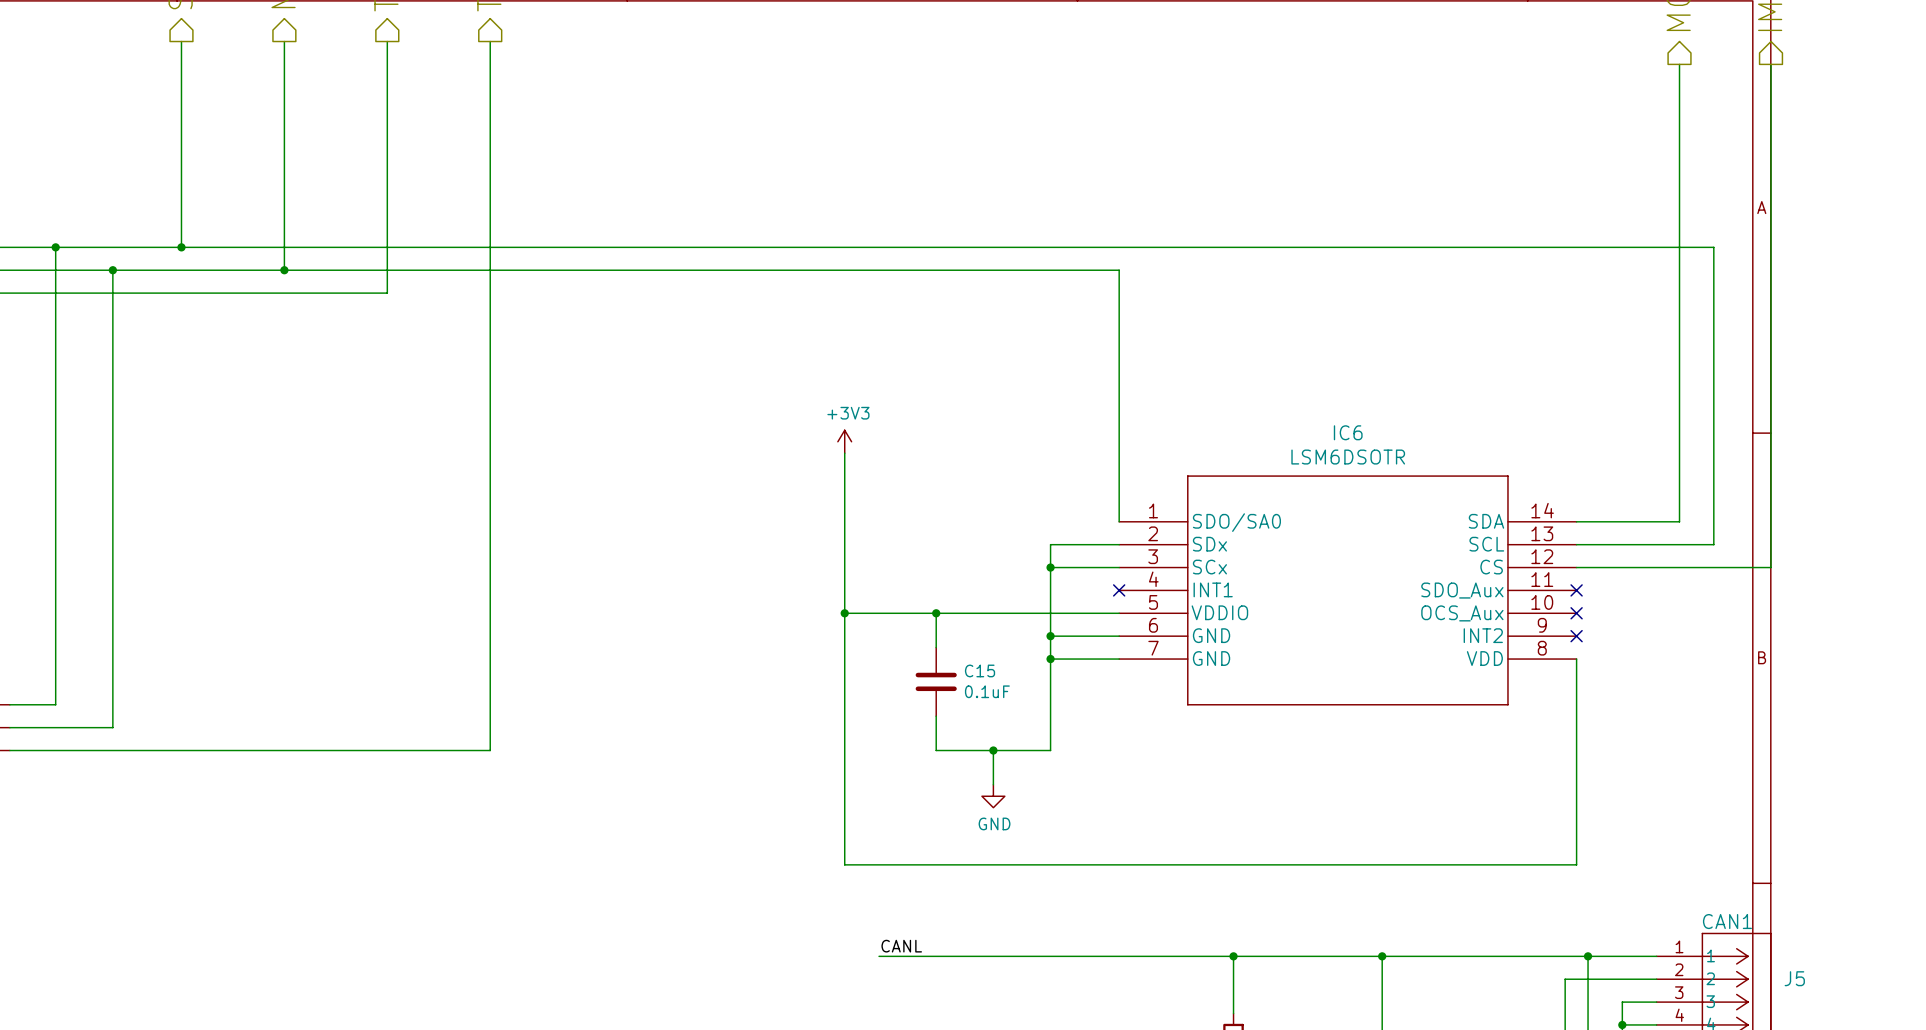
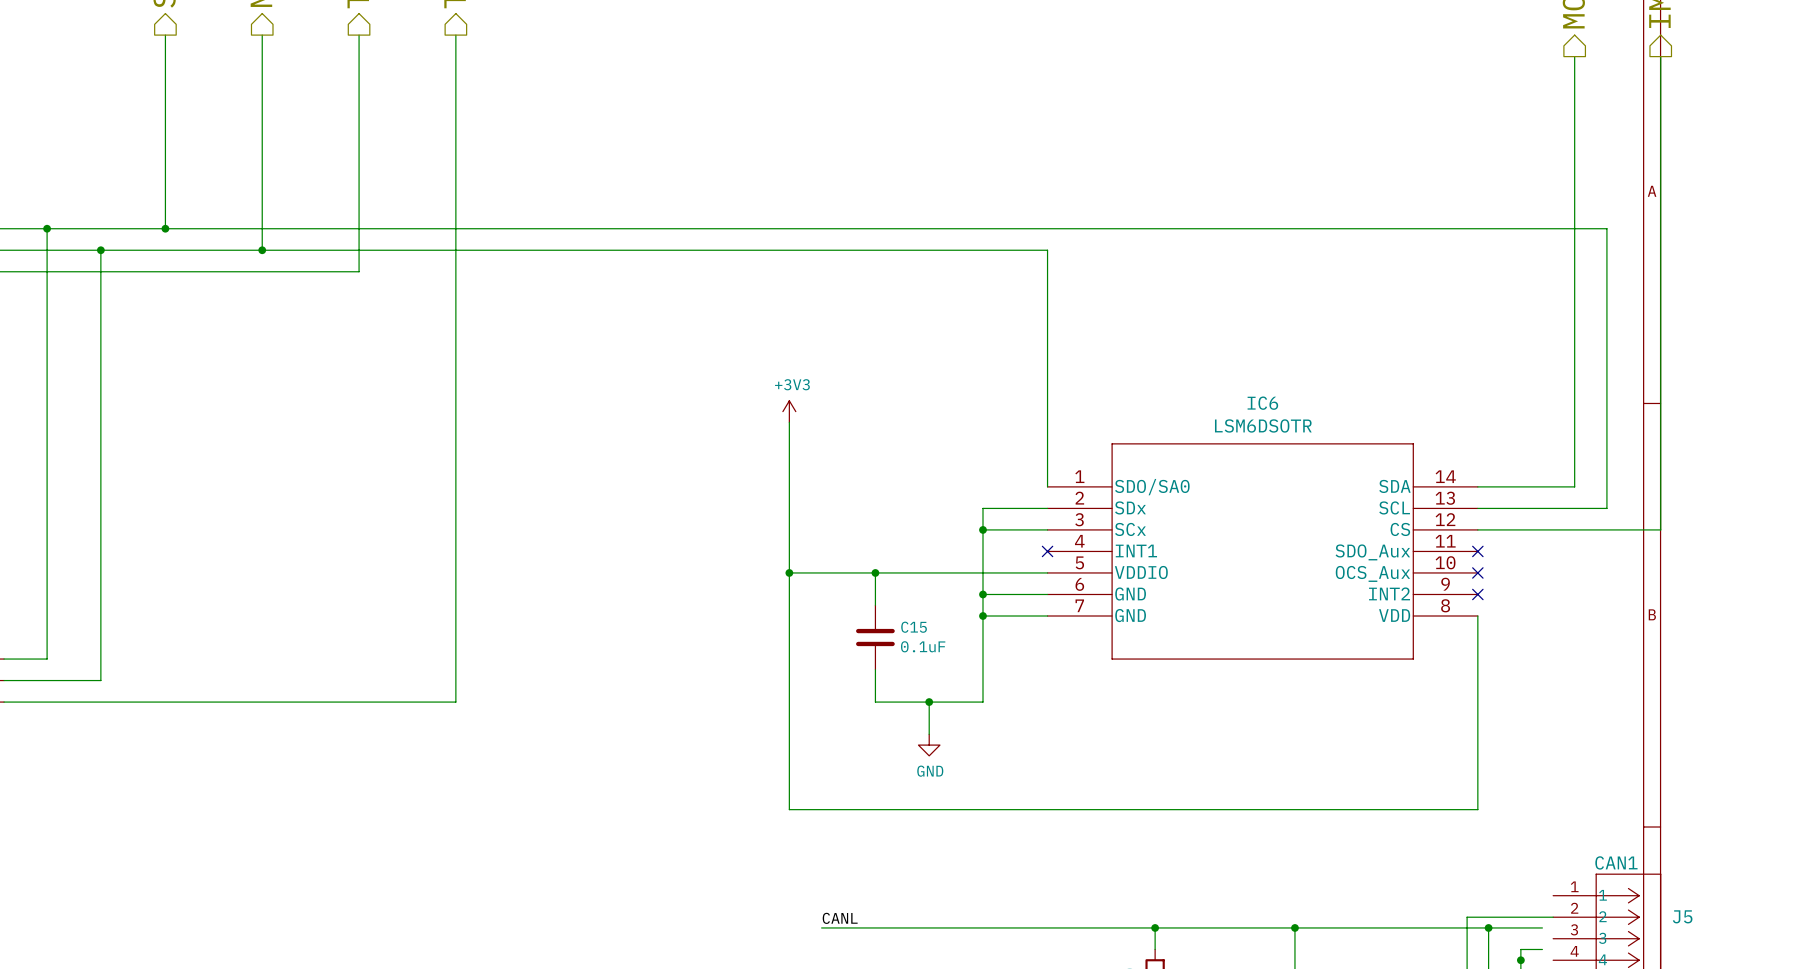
label position: CANL (901, 946) -> CANL (840, 918)
wire: (879, 956) (1656, 956) -> none
wire: (1233, 956) (1233, 990) -> none
junction position: (1233, 956) -> (1155, 927)
wire: (1382, 956) (1382, 990) -> none
junction position: (1382, 956) -> (1294, 927)
wire: (1588, 956) (1588, 990) -> none
junction position: (1588, 956) -> (1488, 927)
wire: none -> (821, 927) (1542, 927)
wire: (1656, 1002) (1622, 1002) (1622, 1013) -> (1542, 949) (1520, 949)
wire: (1622, 1024) (1656, 1024) -> none

